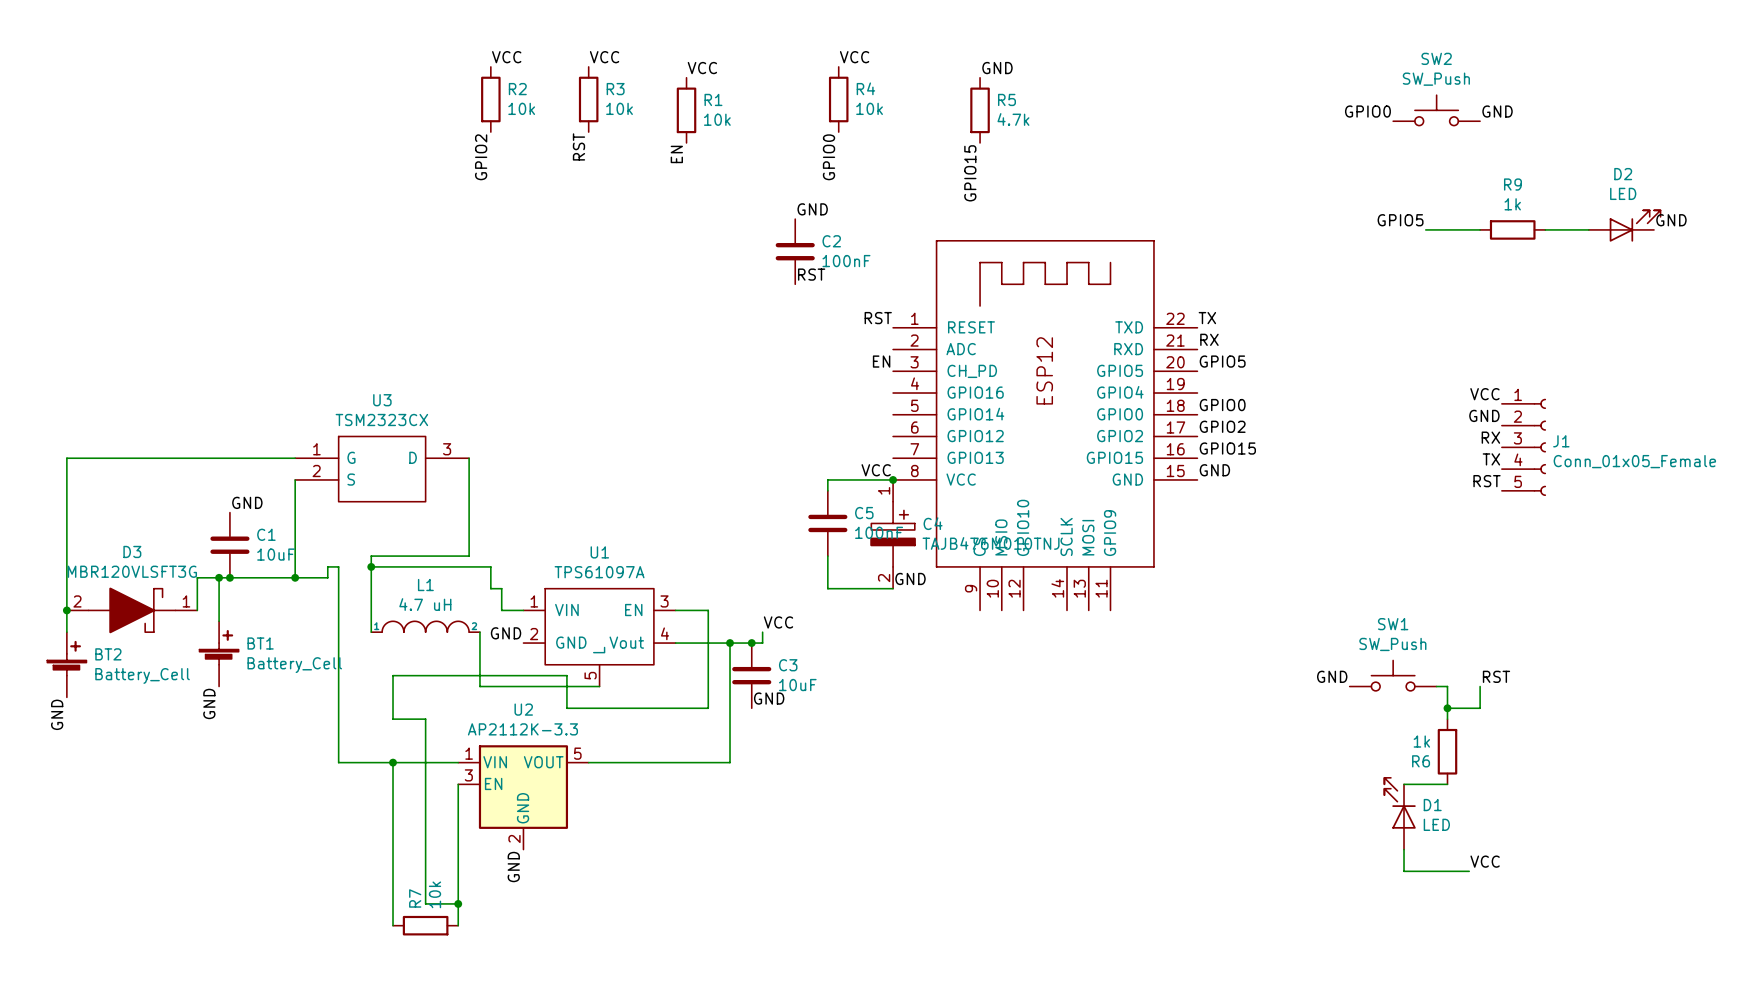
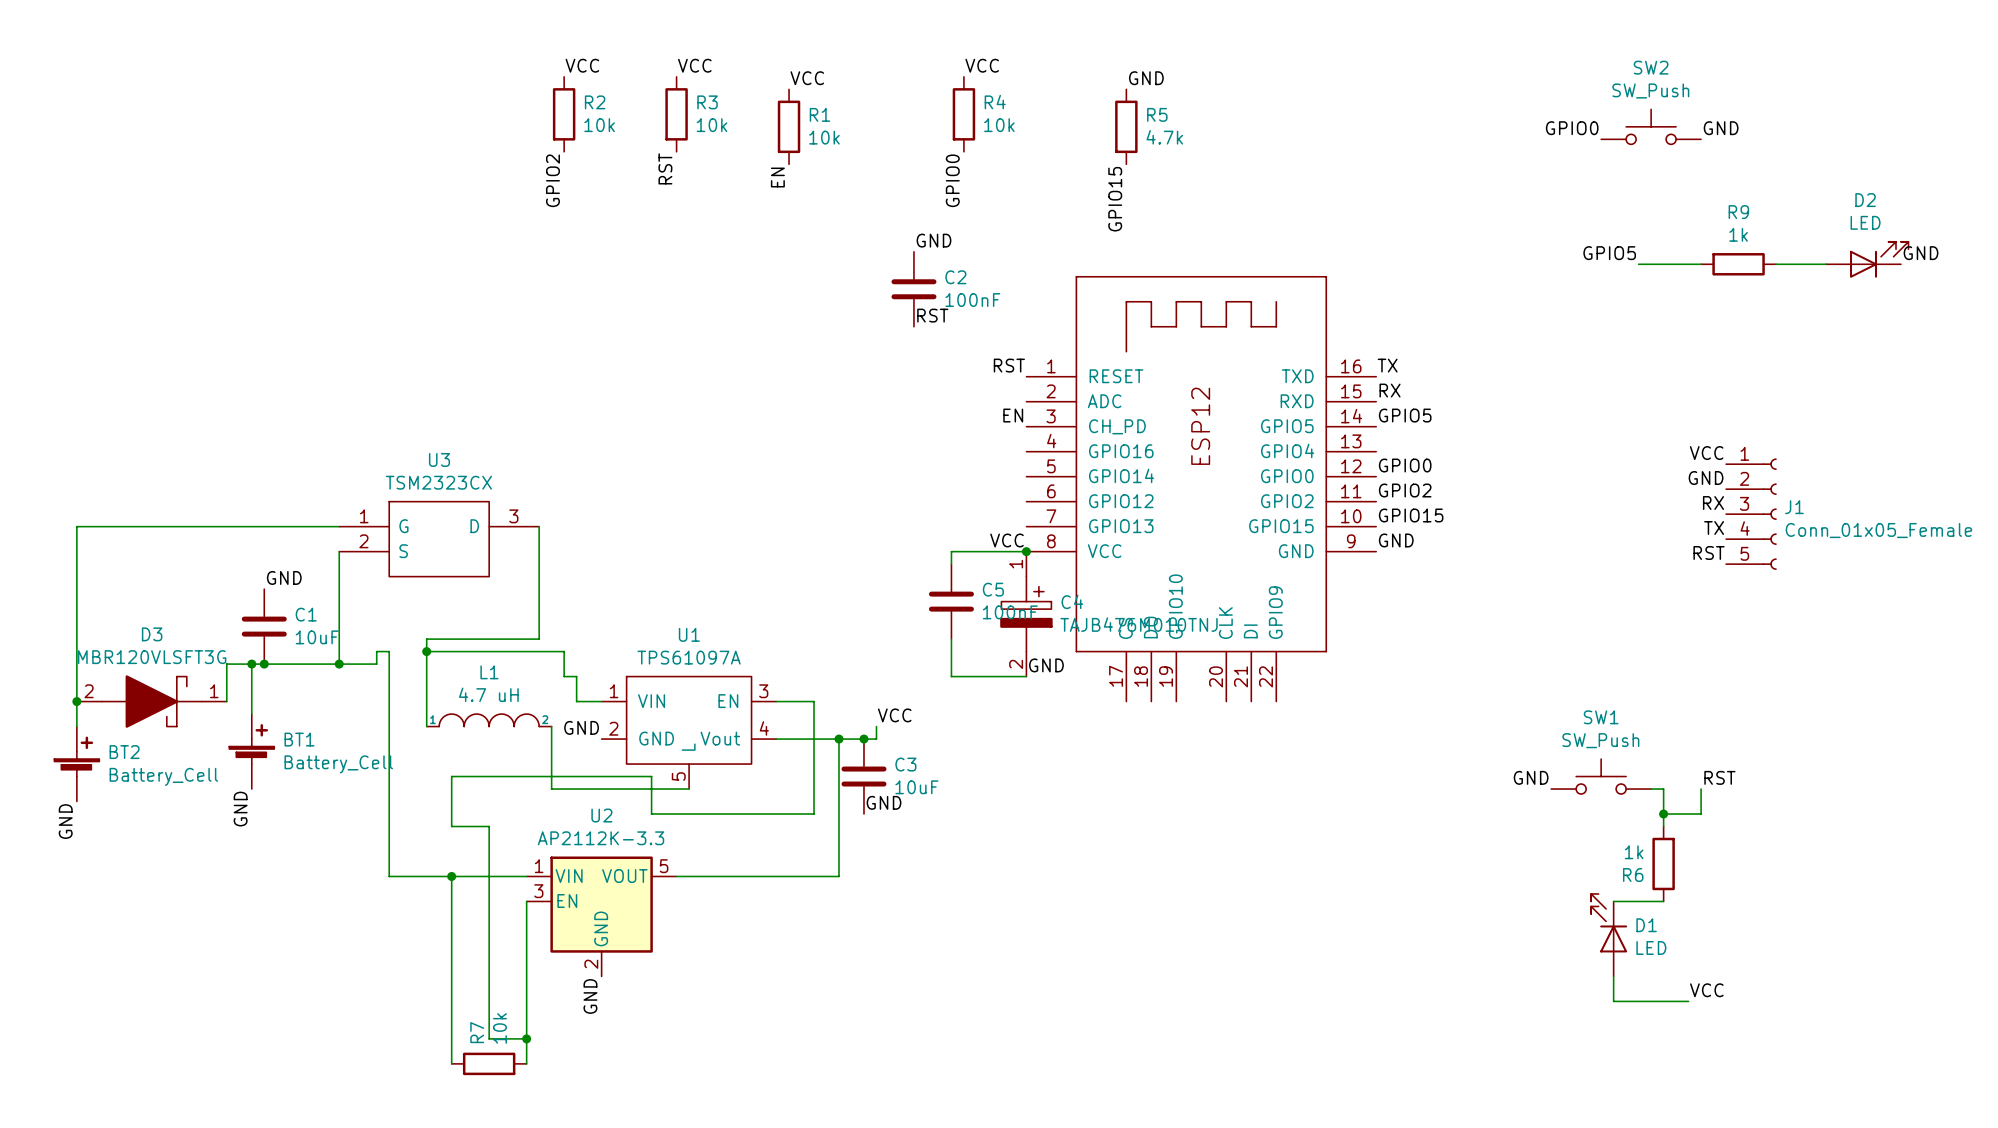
part symbol: [893, 240, 1198, 611] -> [1026, 276, 1377, 702]

